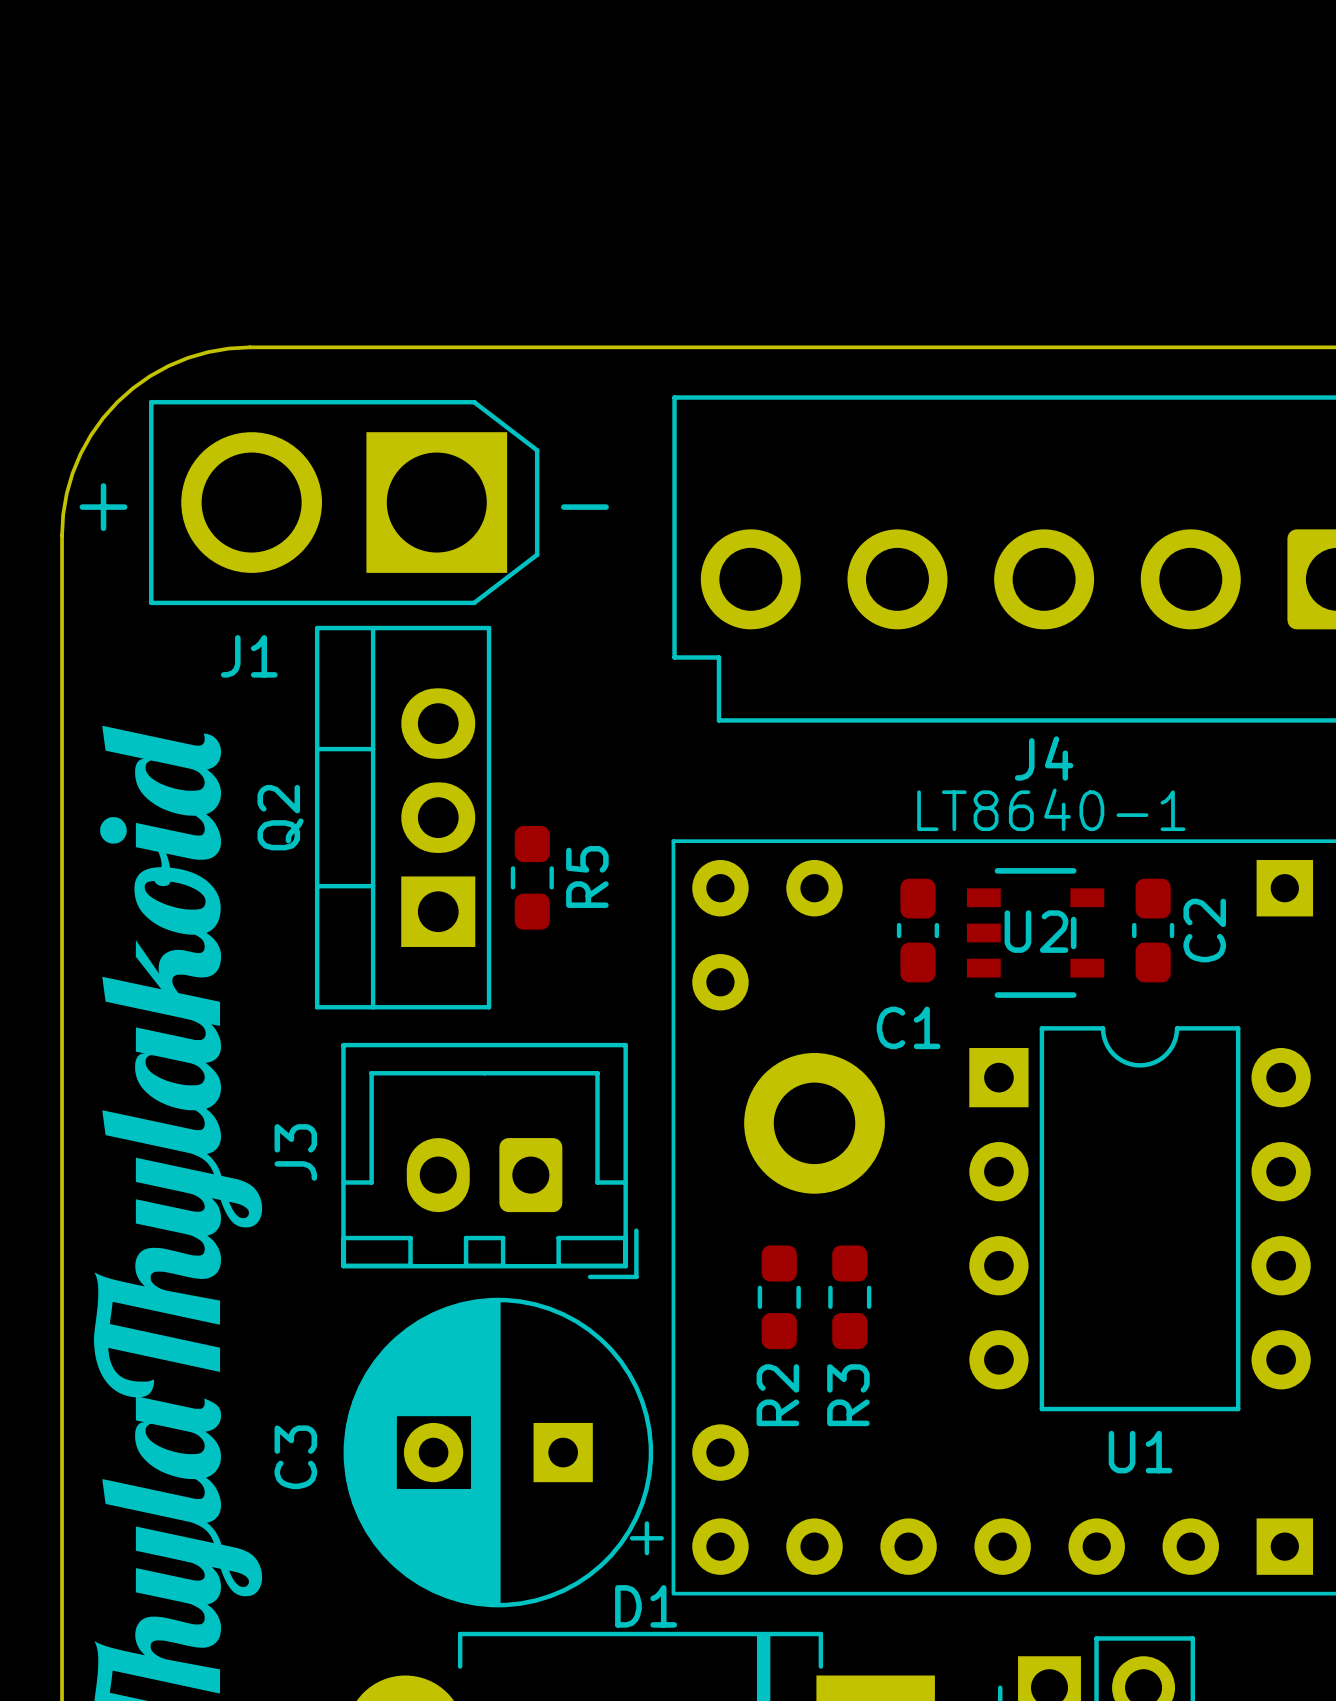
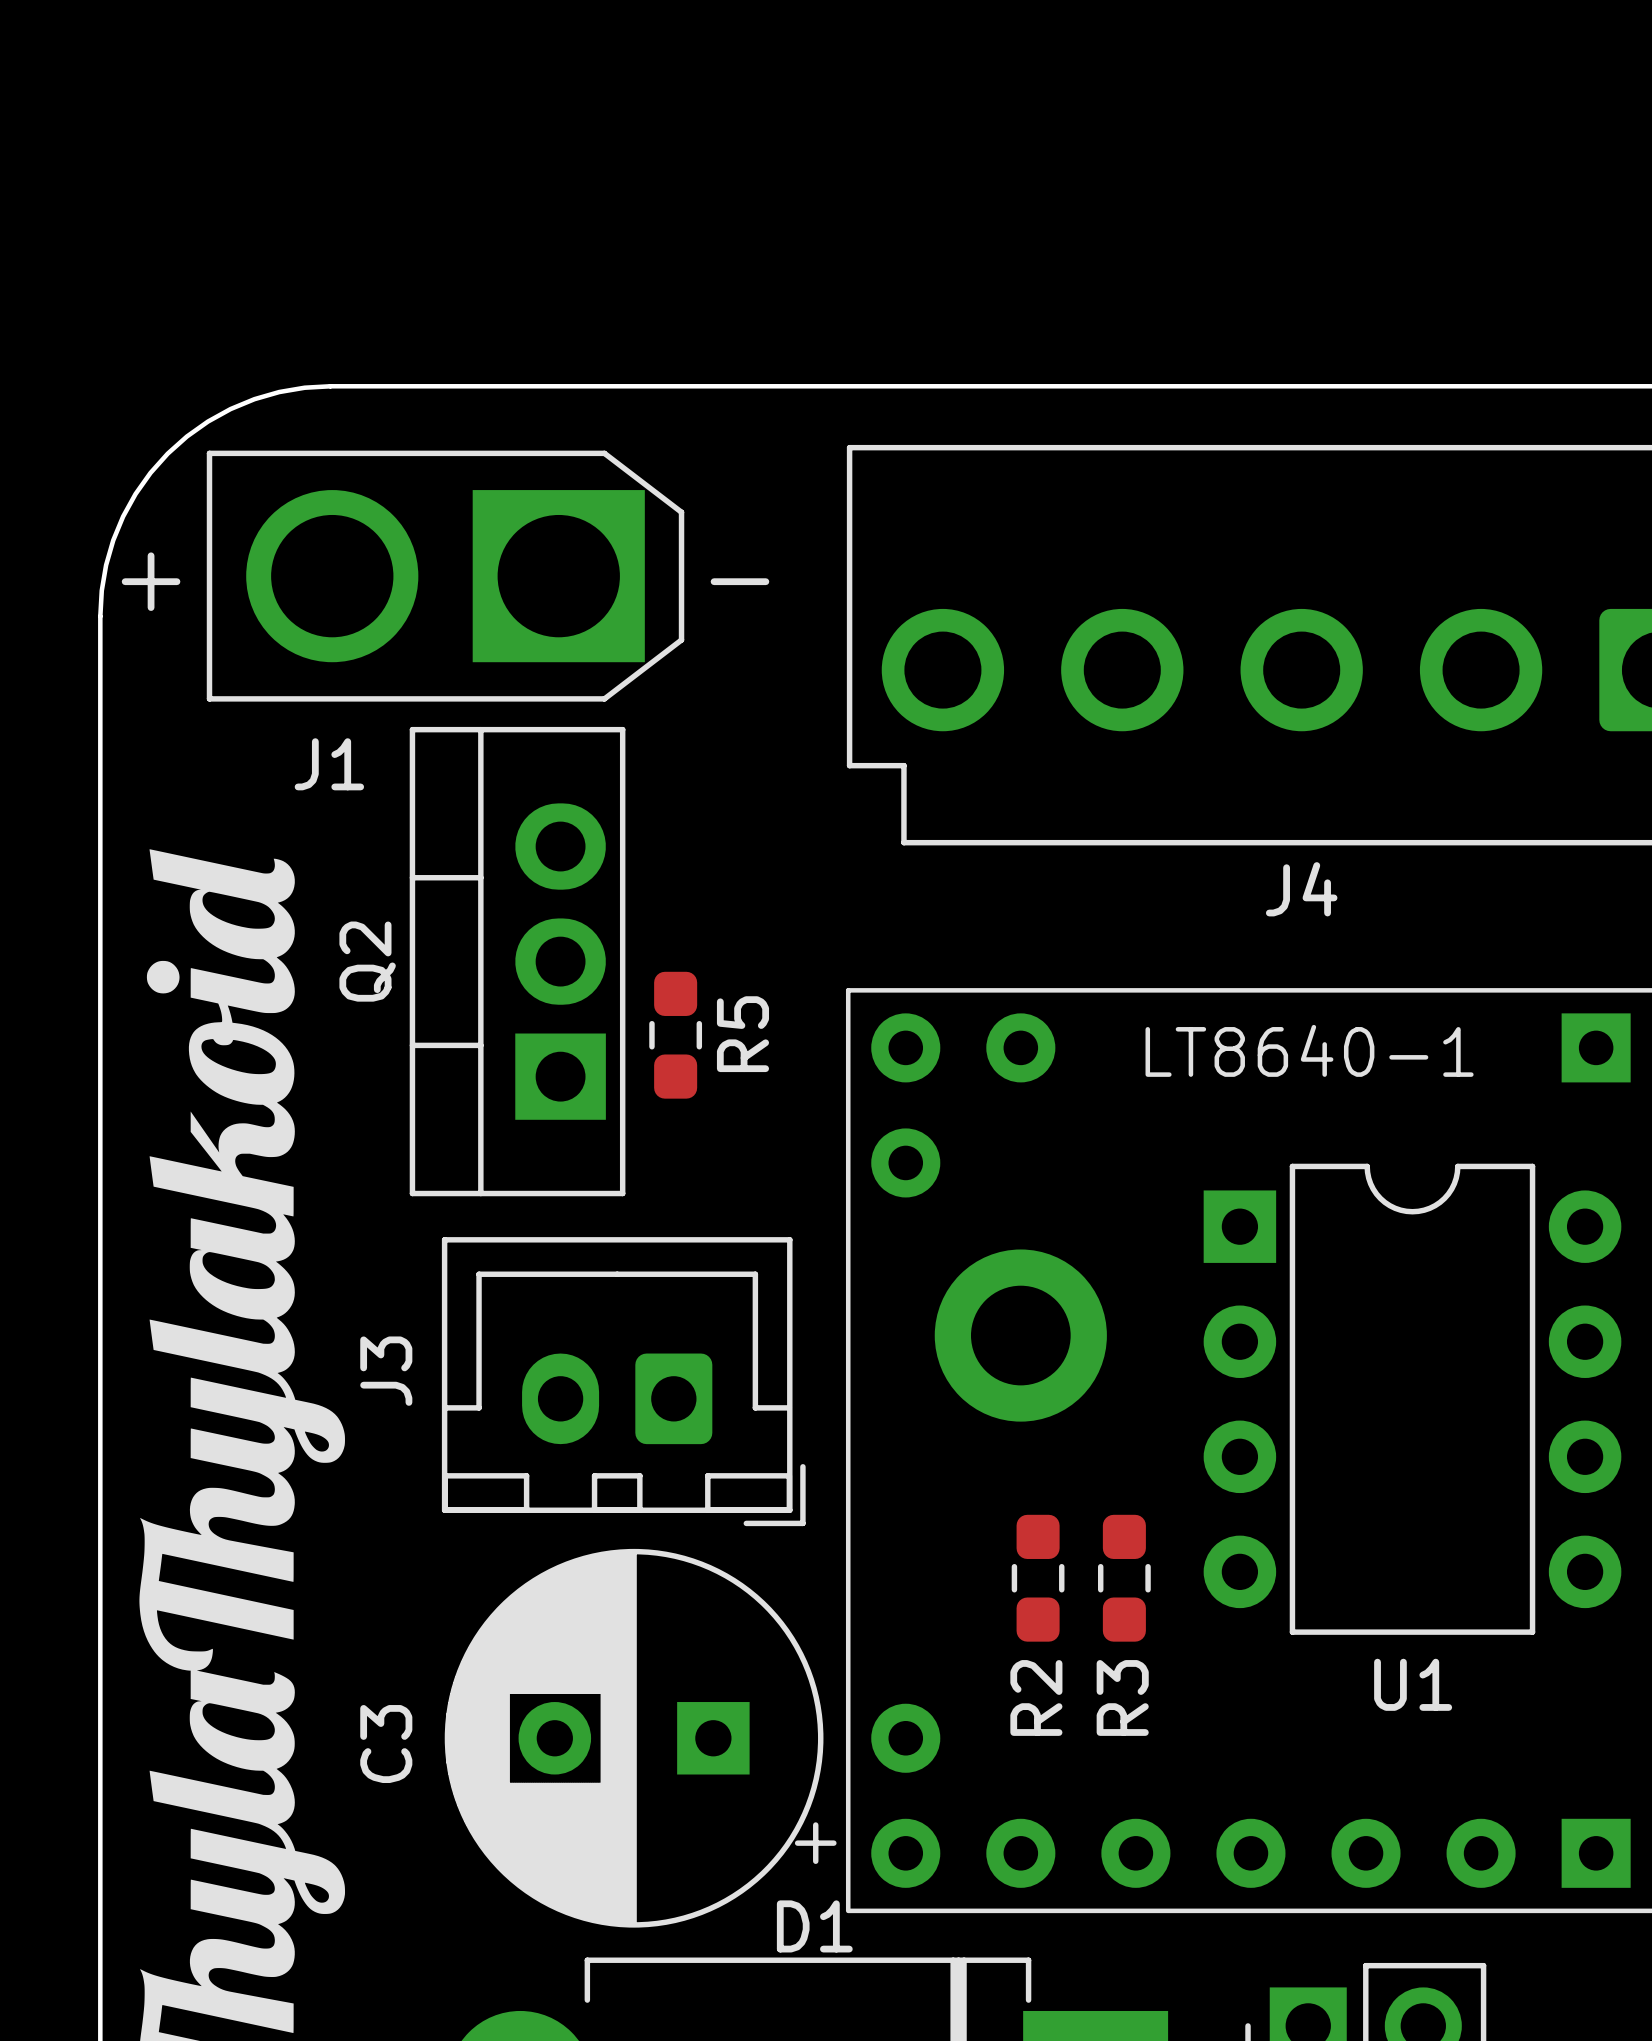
LT8640-1 name position: LT8640-1 (1051, 809) -> LT8640-1 (1309, 1050)
C1: (917, 930) -> none
C2: (1153, 930) -> none
U2: (1035, 932) -> none
U1 position: (1140, 1218) -> (1412, 1399)
R2 position: (779, 1297) -> (1038, 1578)
R3 position: (849, 1297) -> (1124, 1578)

